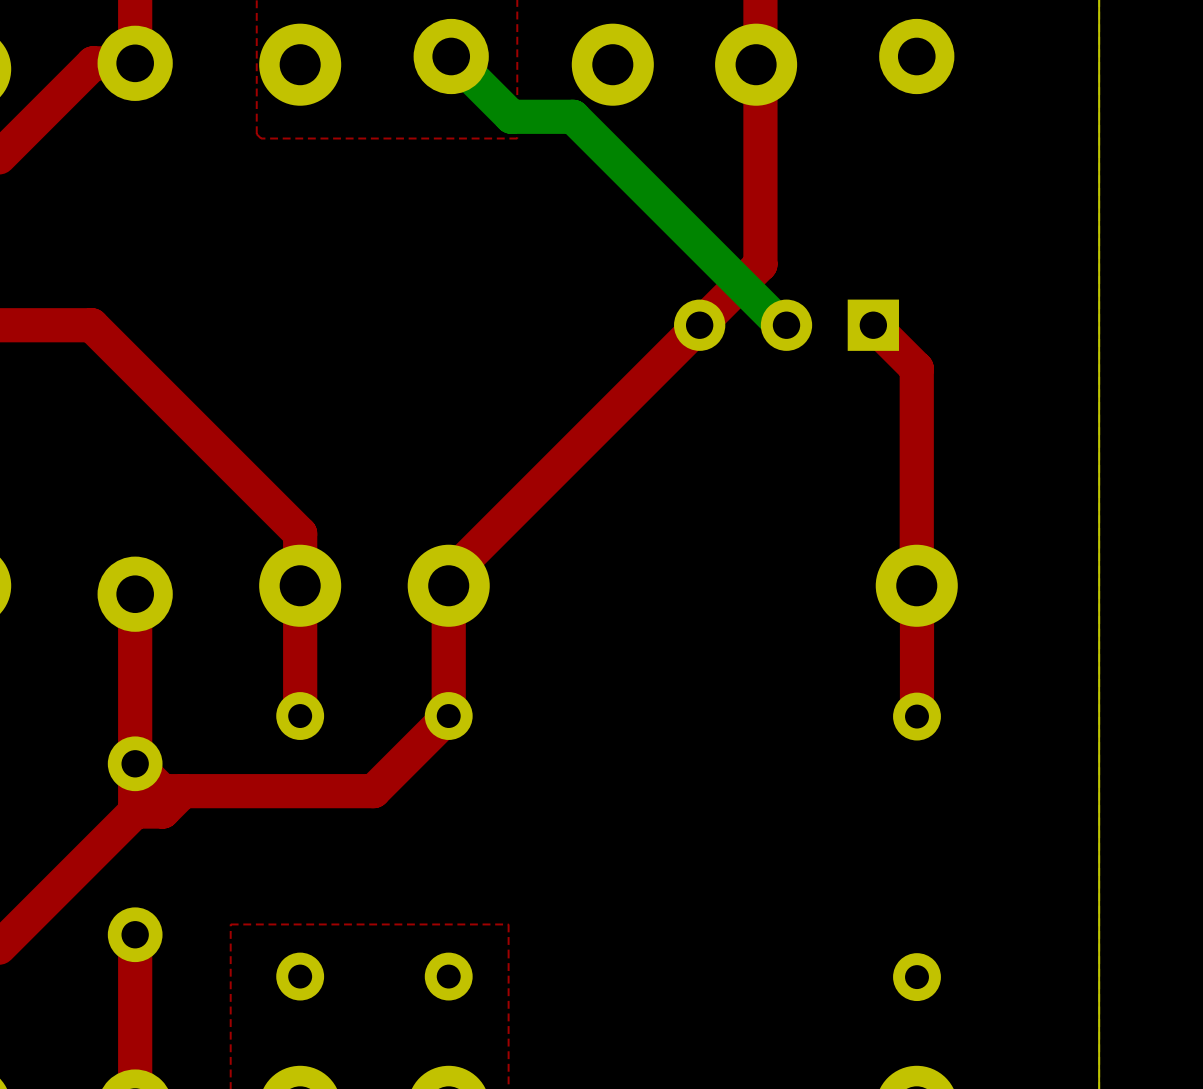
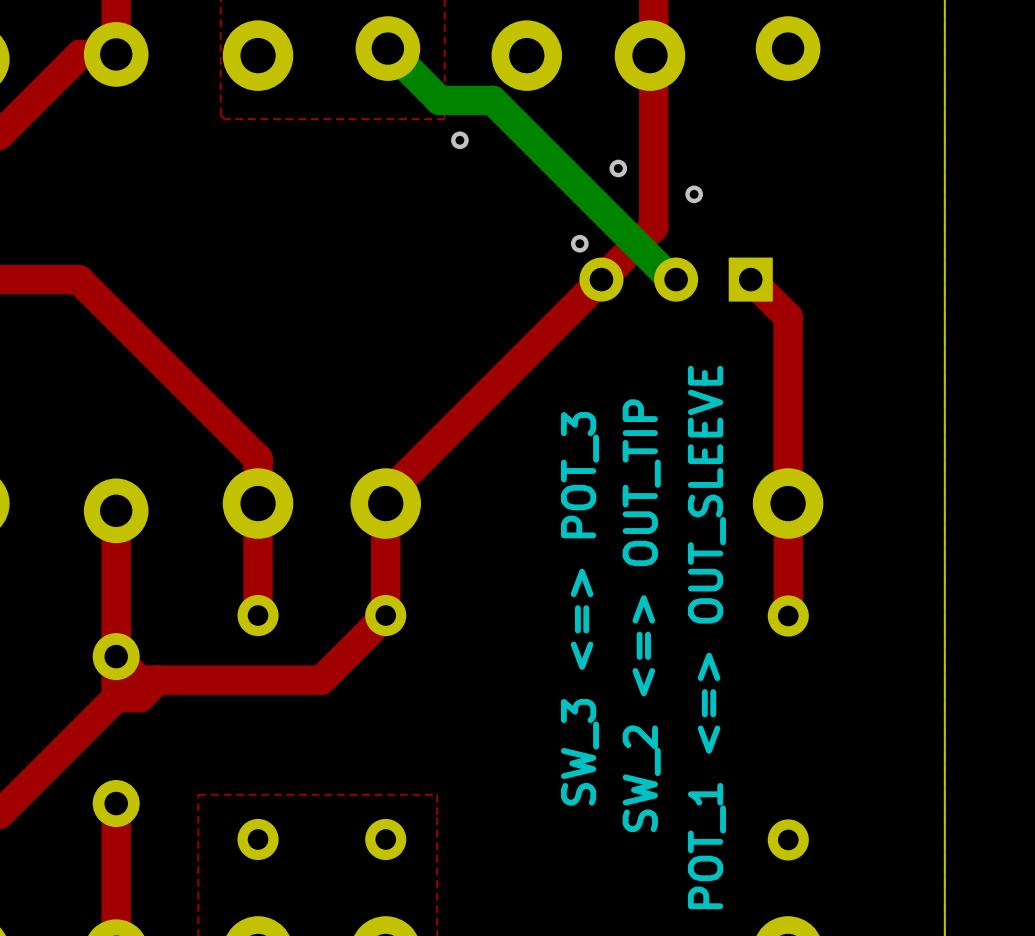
via: none -> (459, 140)
via: none -> (618, 168)
via: none -> (694, 194)
via: none -> (579, 243)
text: none -> SW_3 <=> POT_3 (579, 608)
text: none -> SW_2 <=> OUT_TIP (641, 615)
text: none -> POT_1 <=> OUT_SLEEVE (706, 637)

